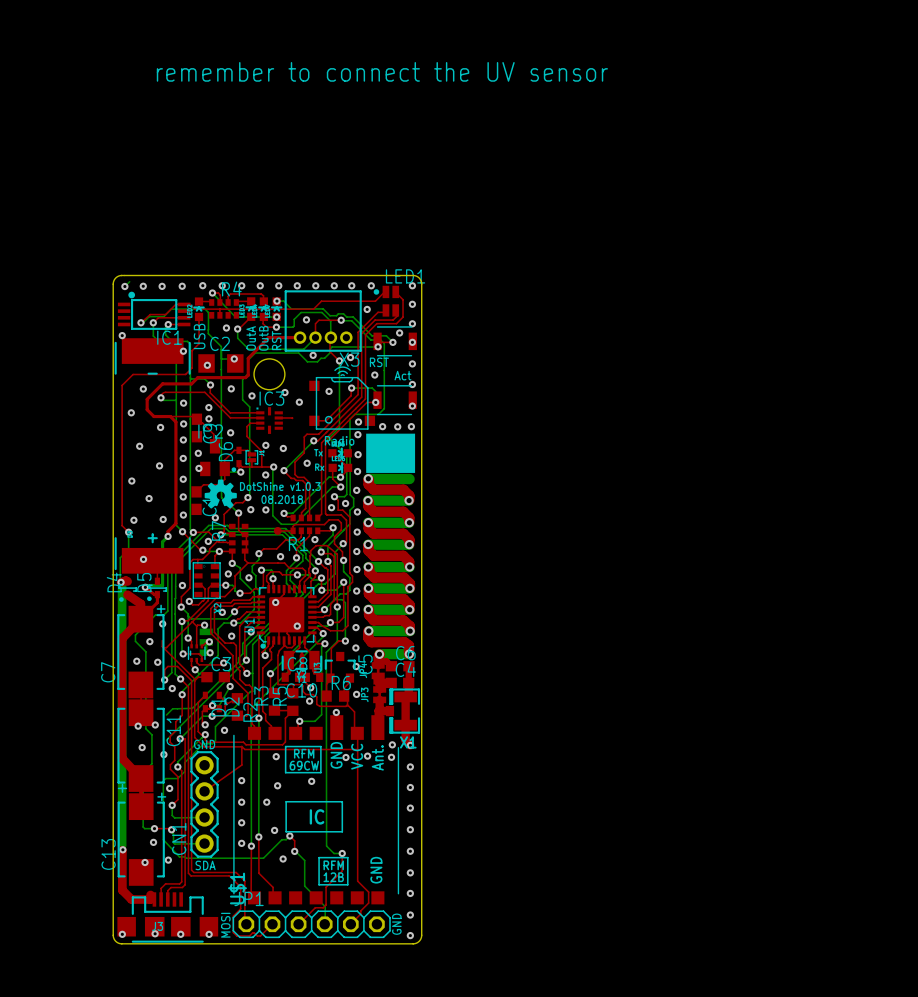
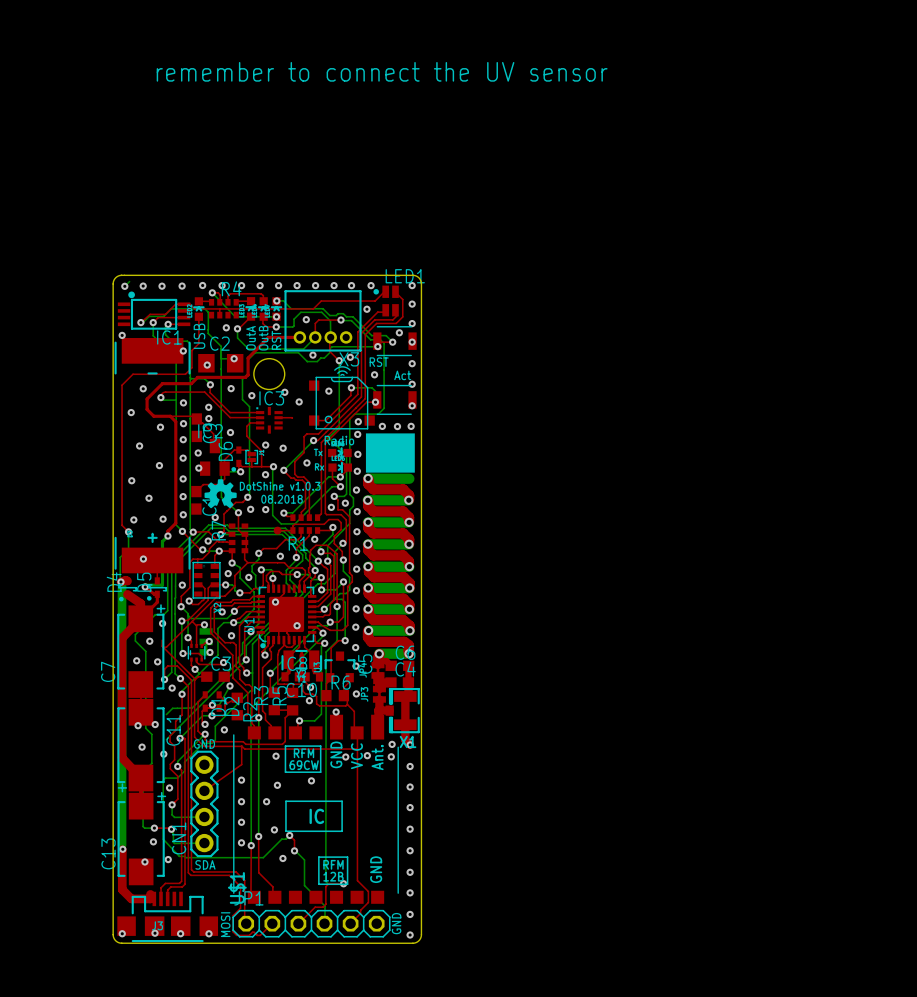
bottom track: (326, 652) (326, 846) (334, 853) (342, 853) -> (326, 651) (325, 881) (327, 883) (343, 883)
top track: (342, 853) (342, 871) (329, 884) -> (343, 883) (328, 883)
via position: (342, 853) -> (343, 883)

